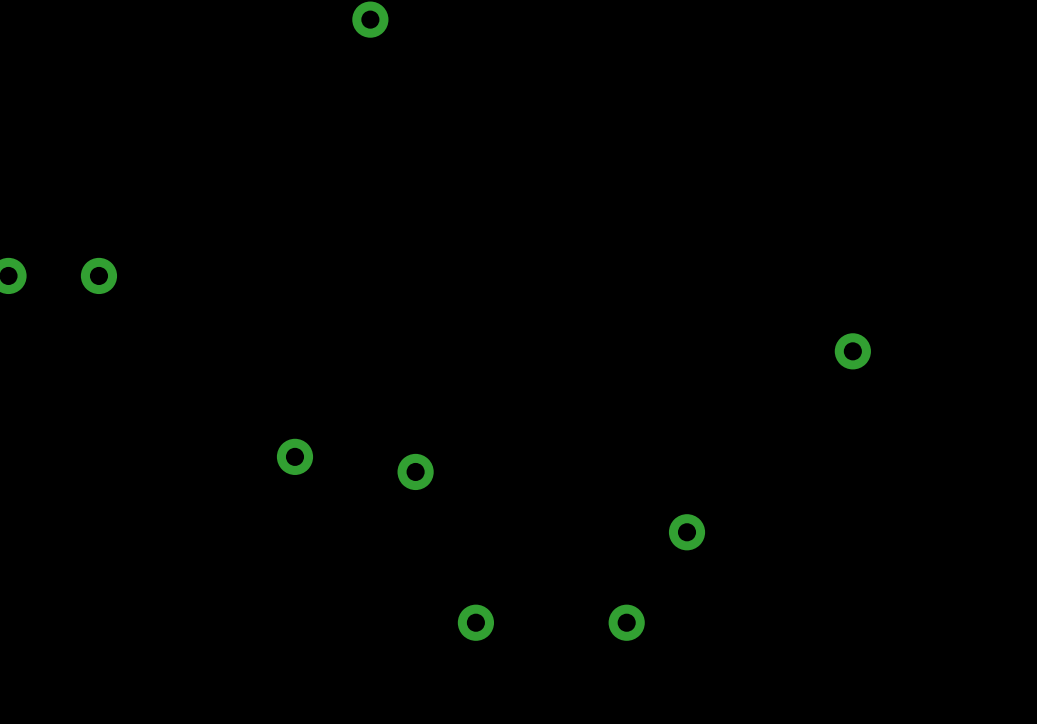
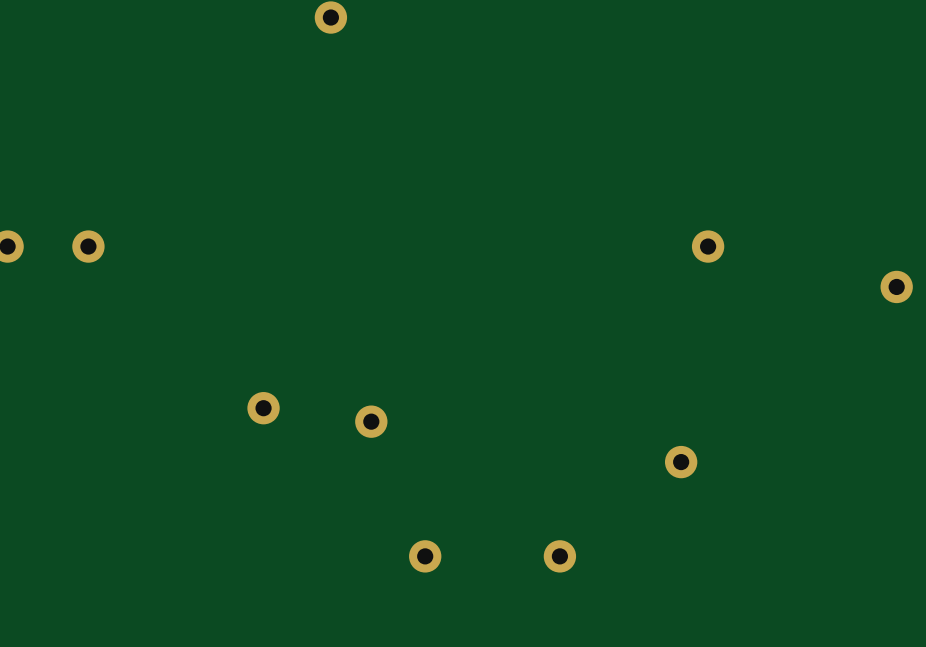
via: none -> (708, 246)
via: none -> (896, 286)
via: (852, 351) -> none
via position: (687, 532) -> (681, 462)

